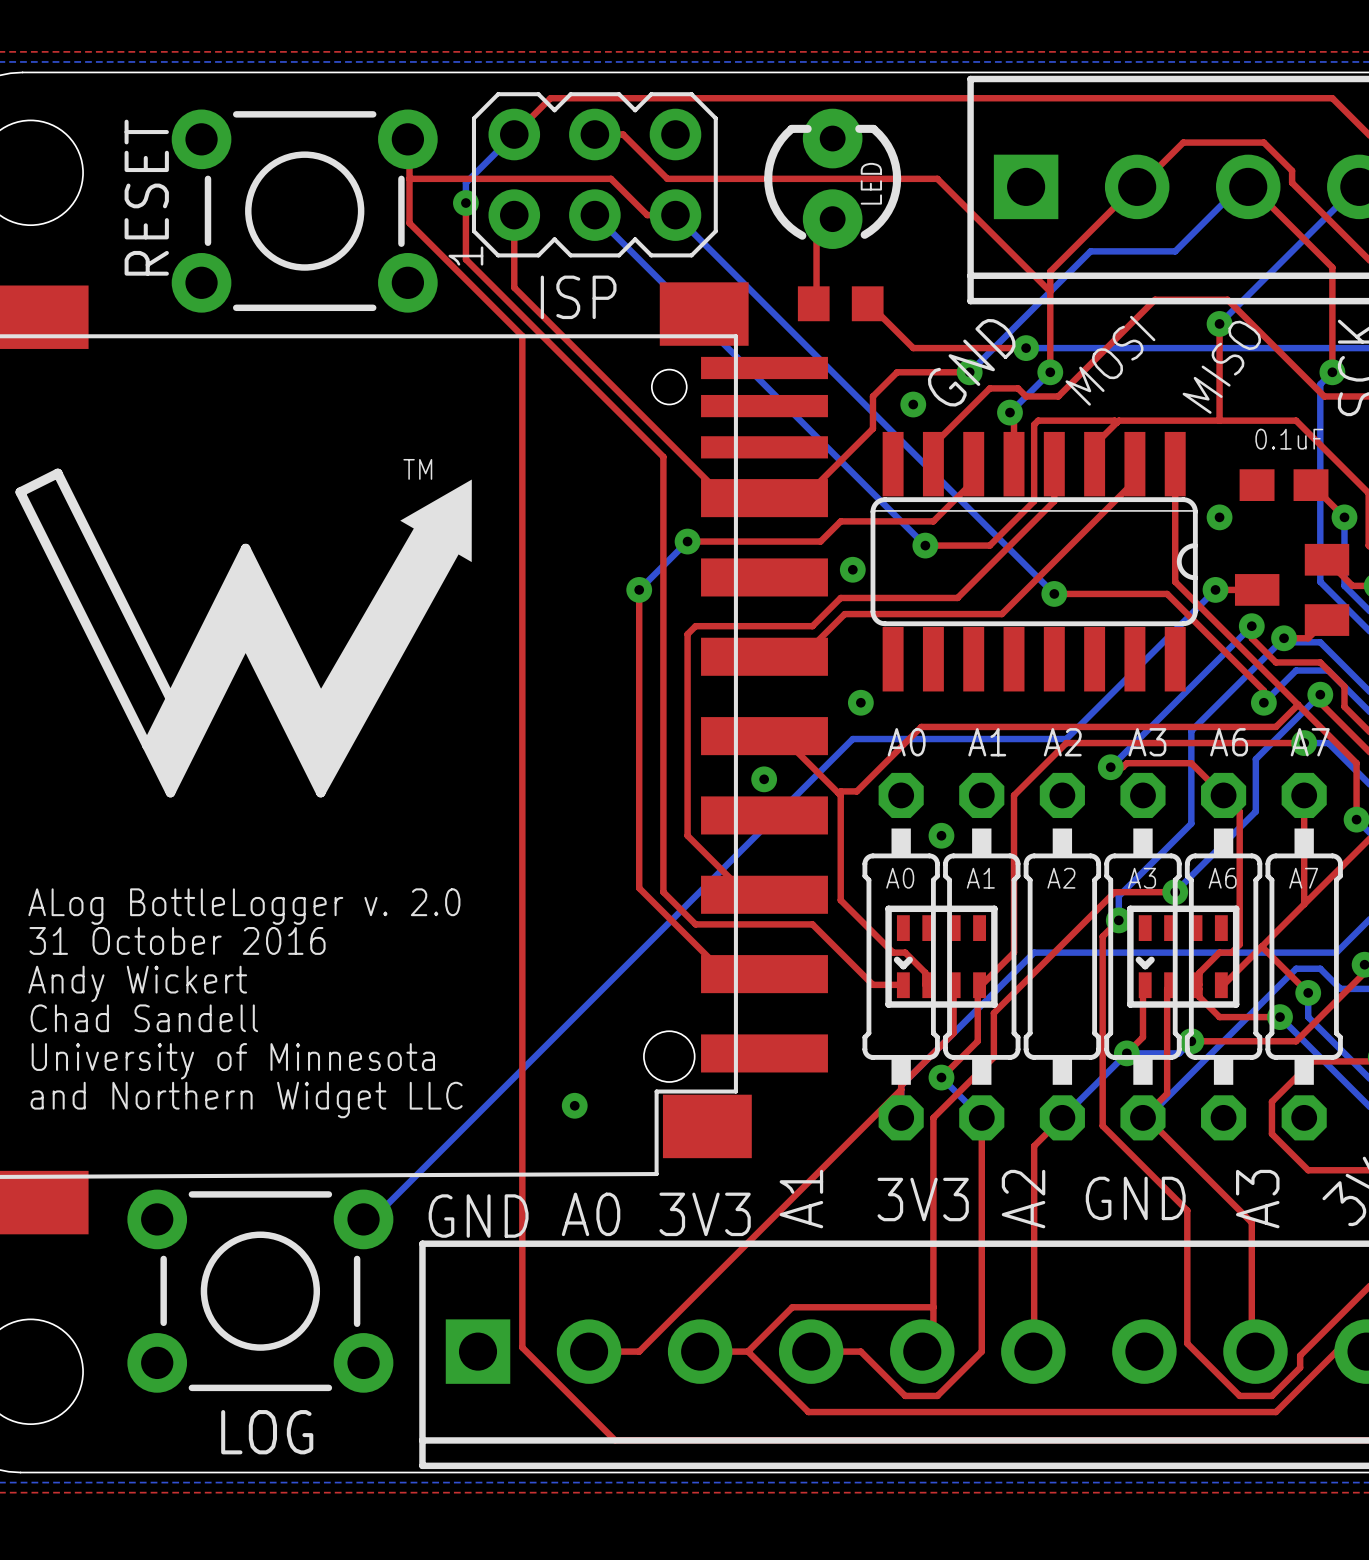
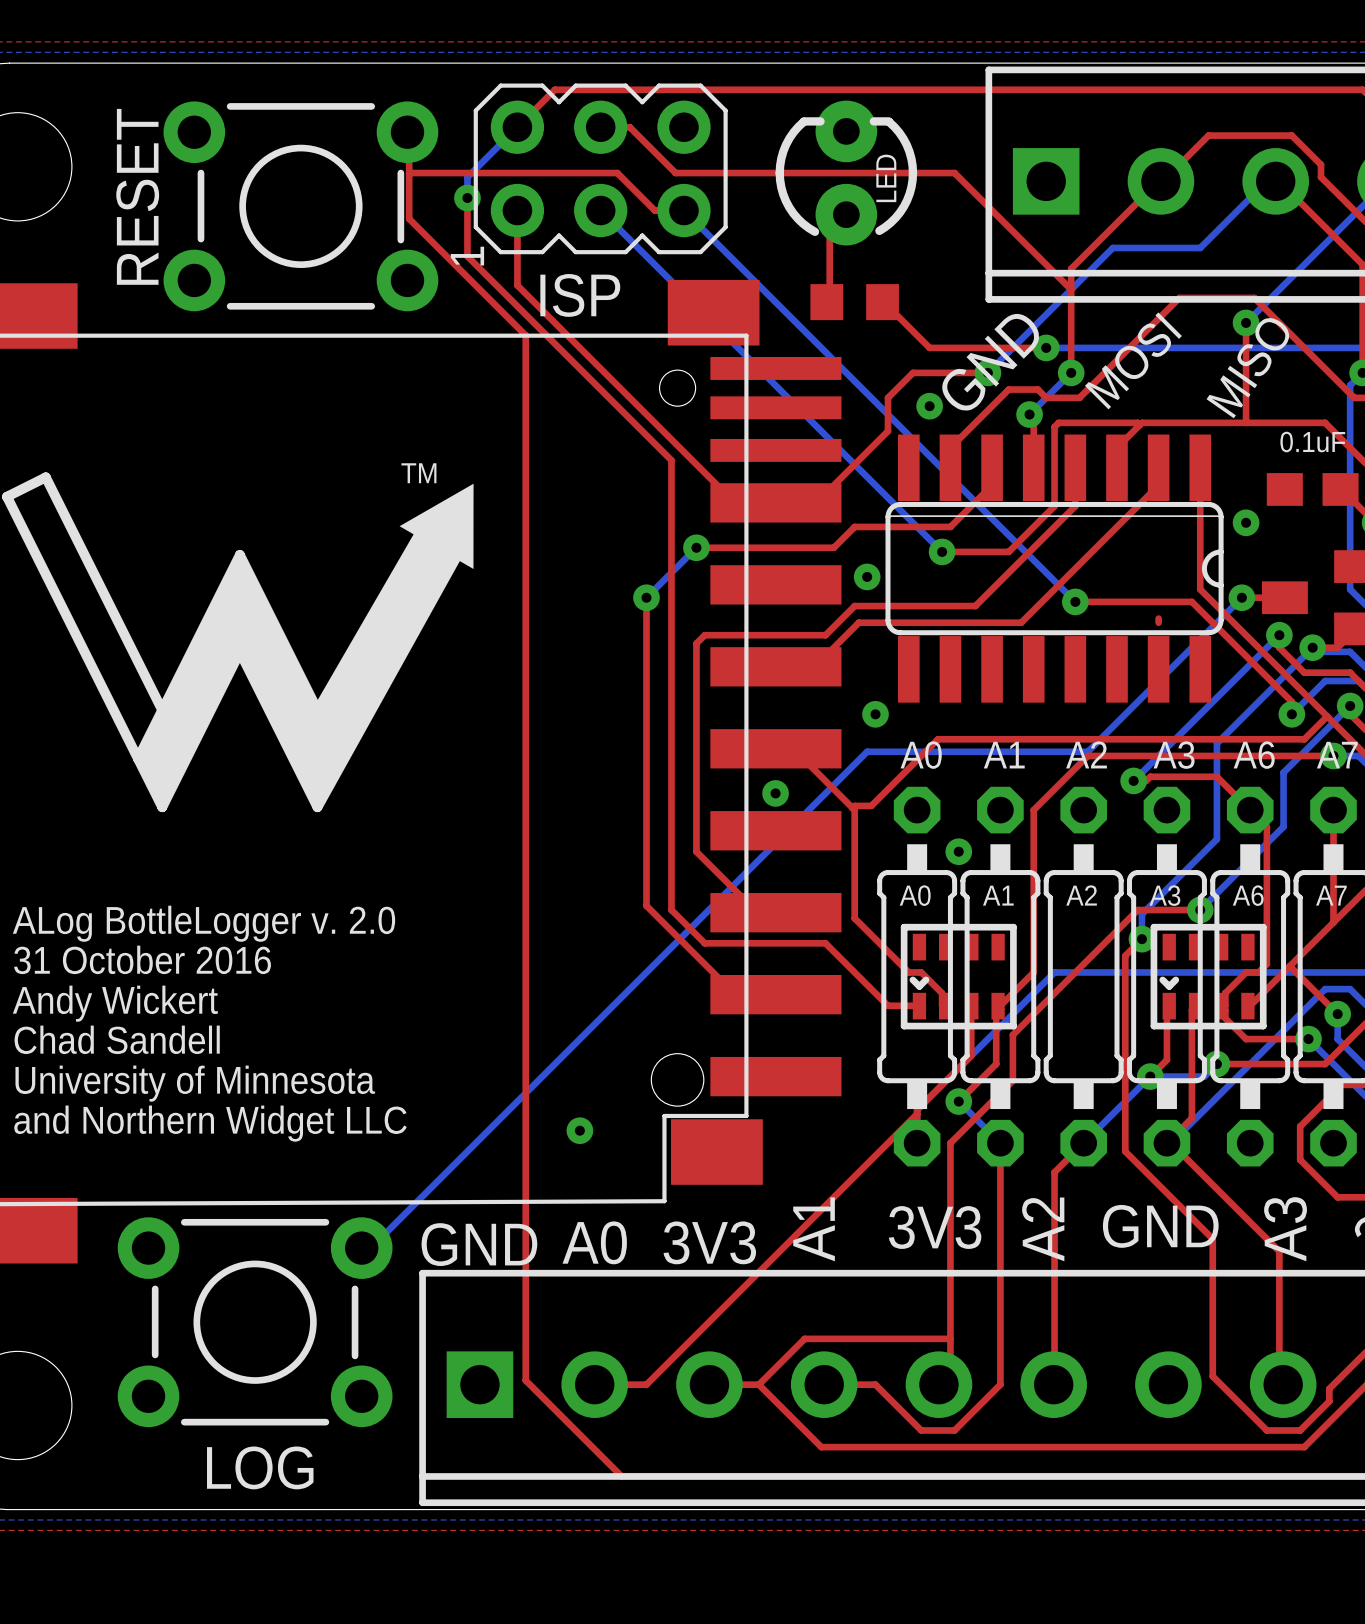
top track: none -> (1158, 618) (1158, 622)

